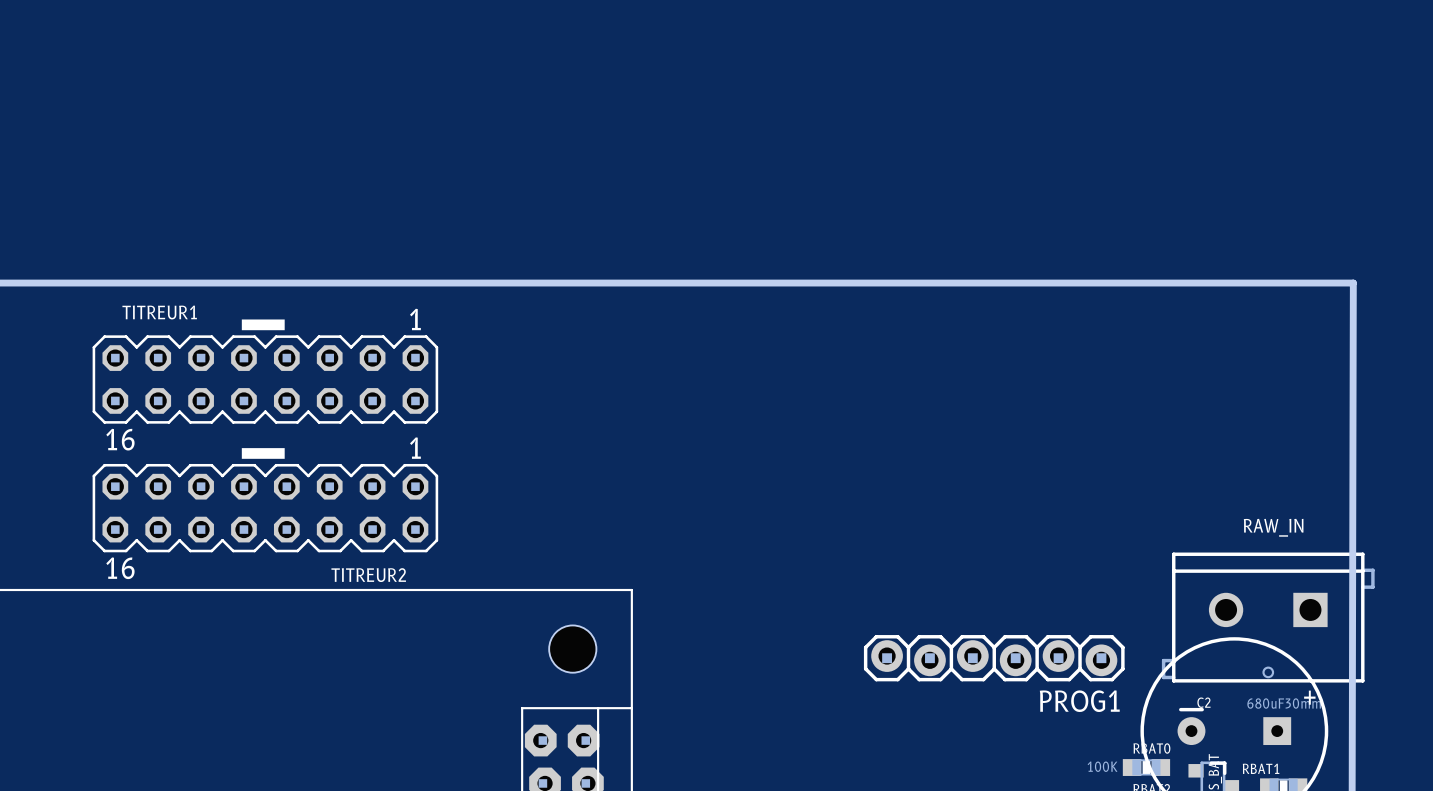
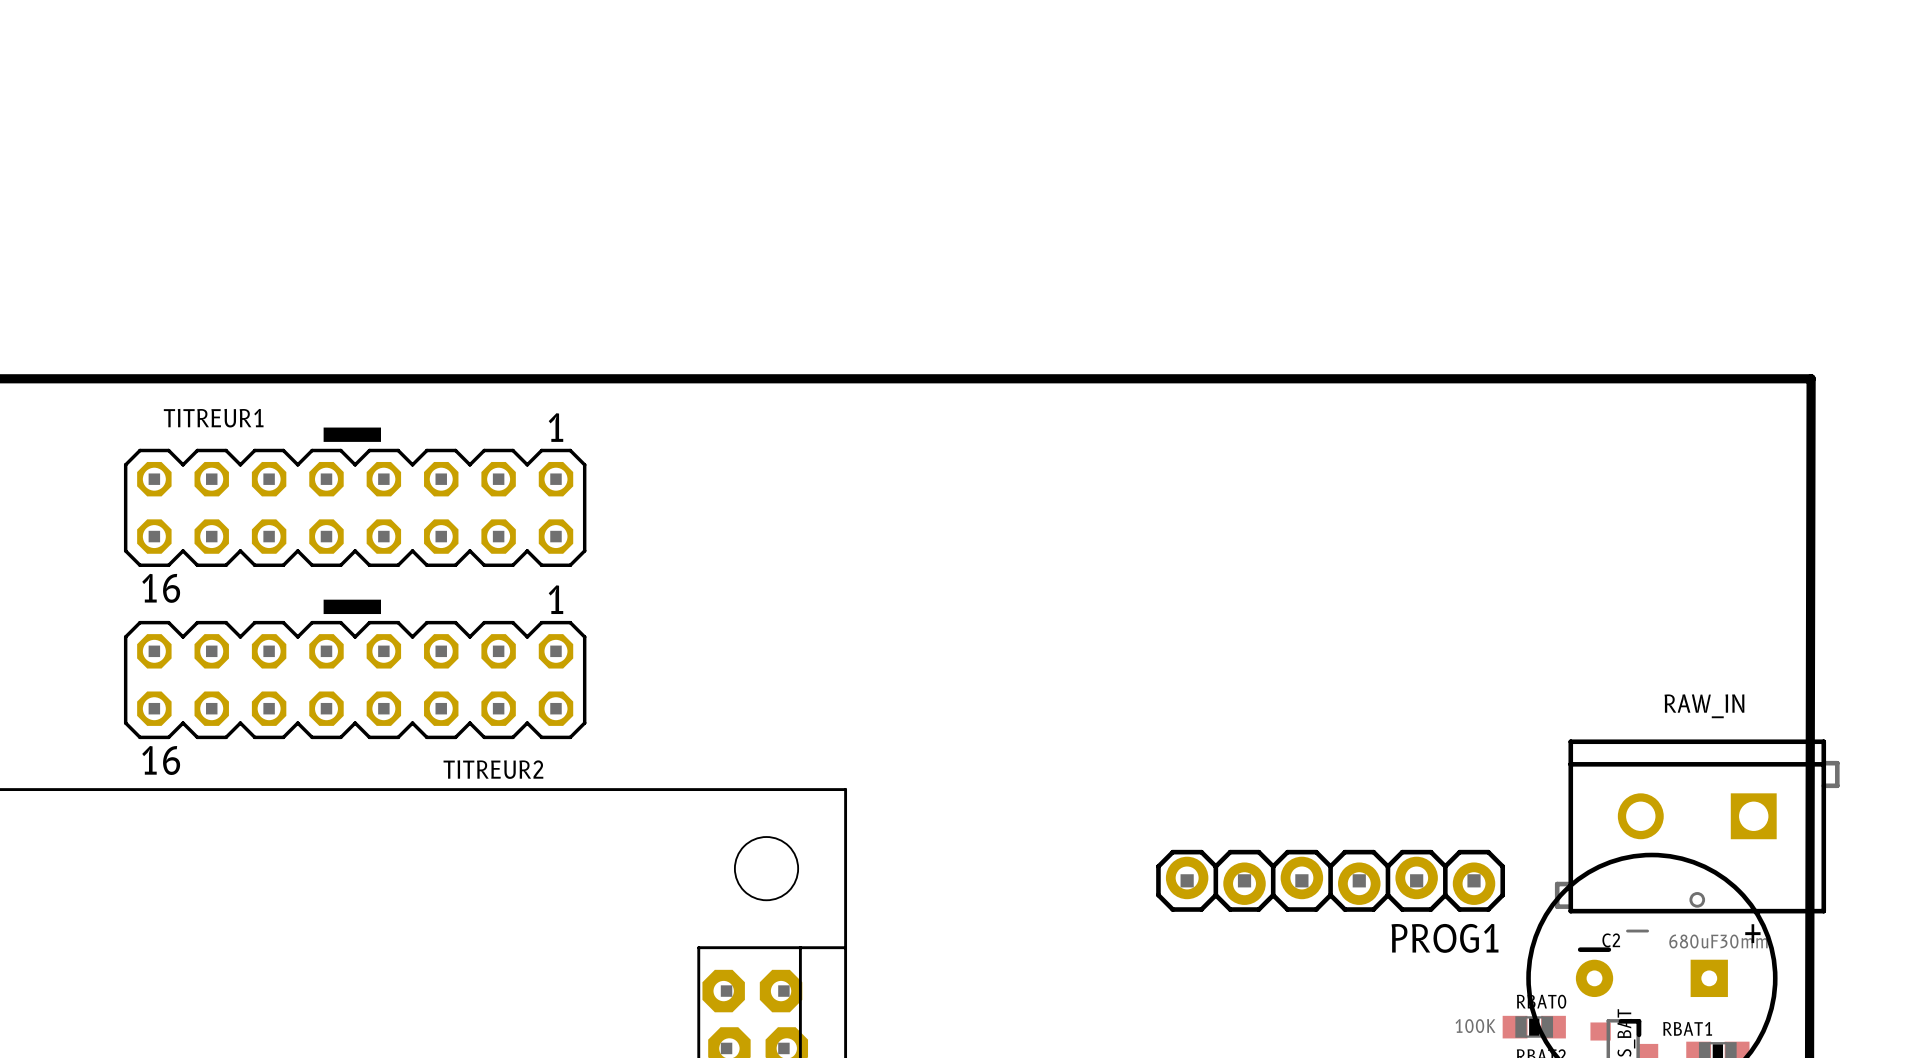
RAW_IN footprint: [1161, 552, 1375, 683] -> [1554, 739, 1840, 933]

